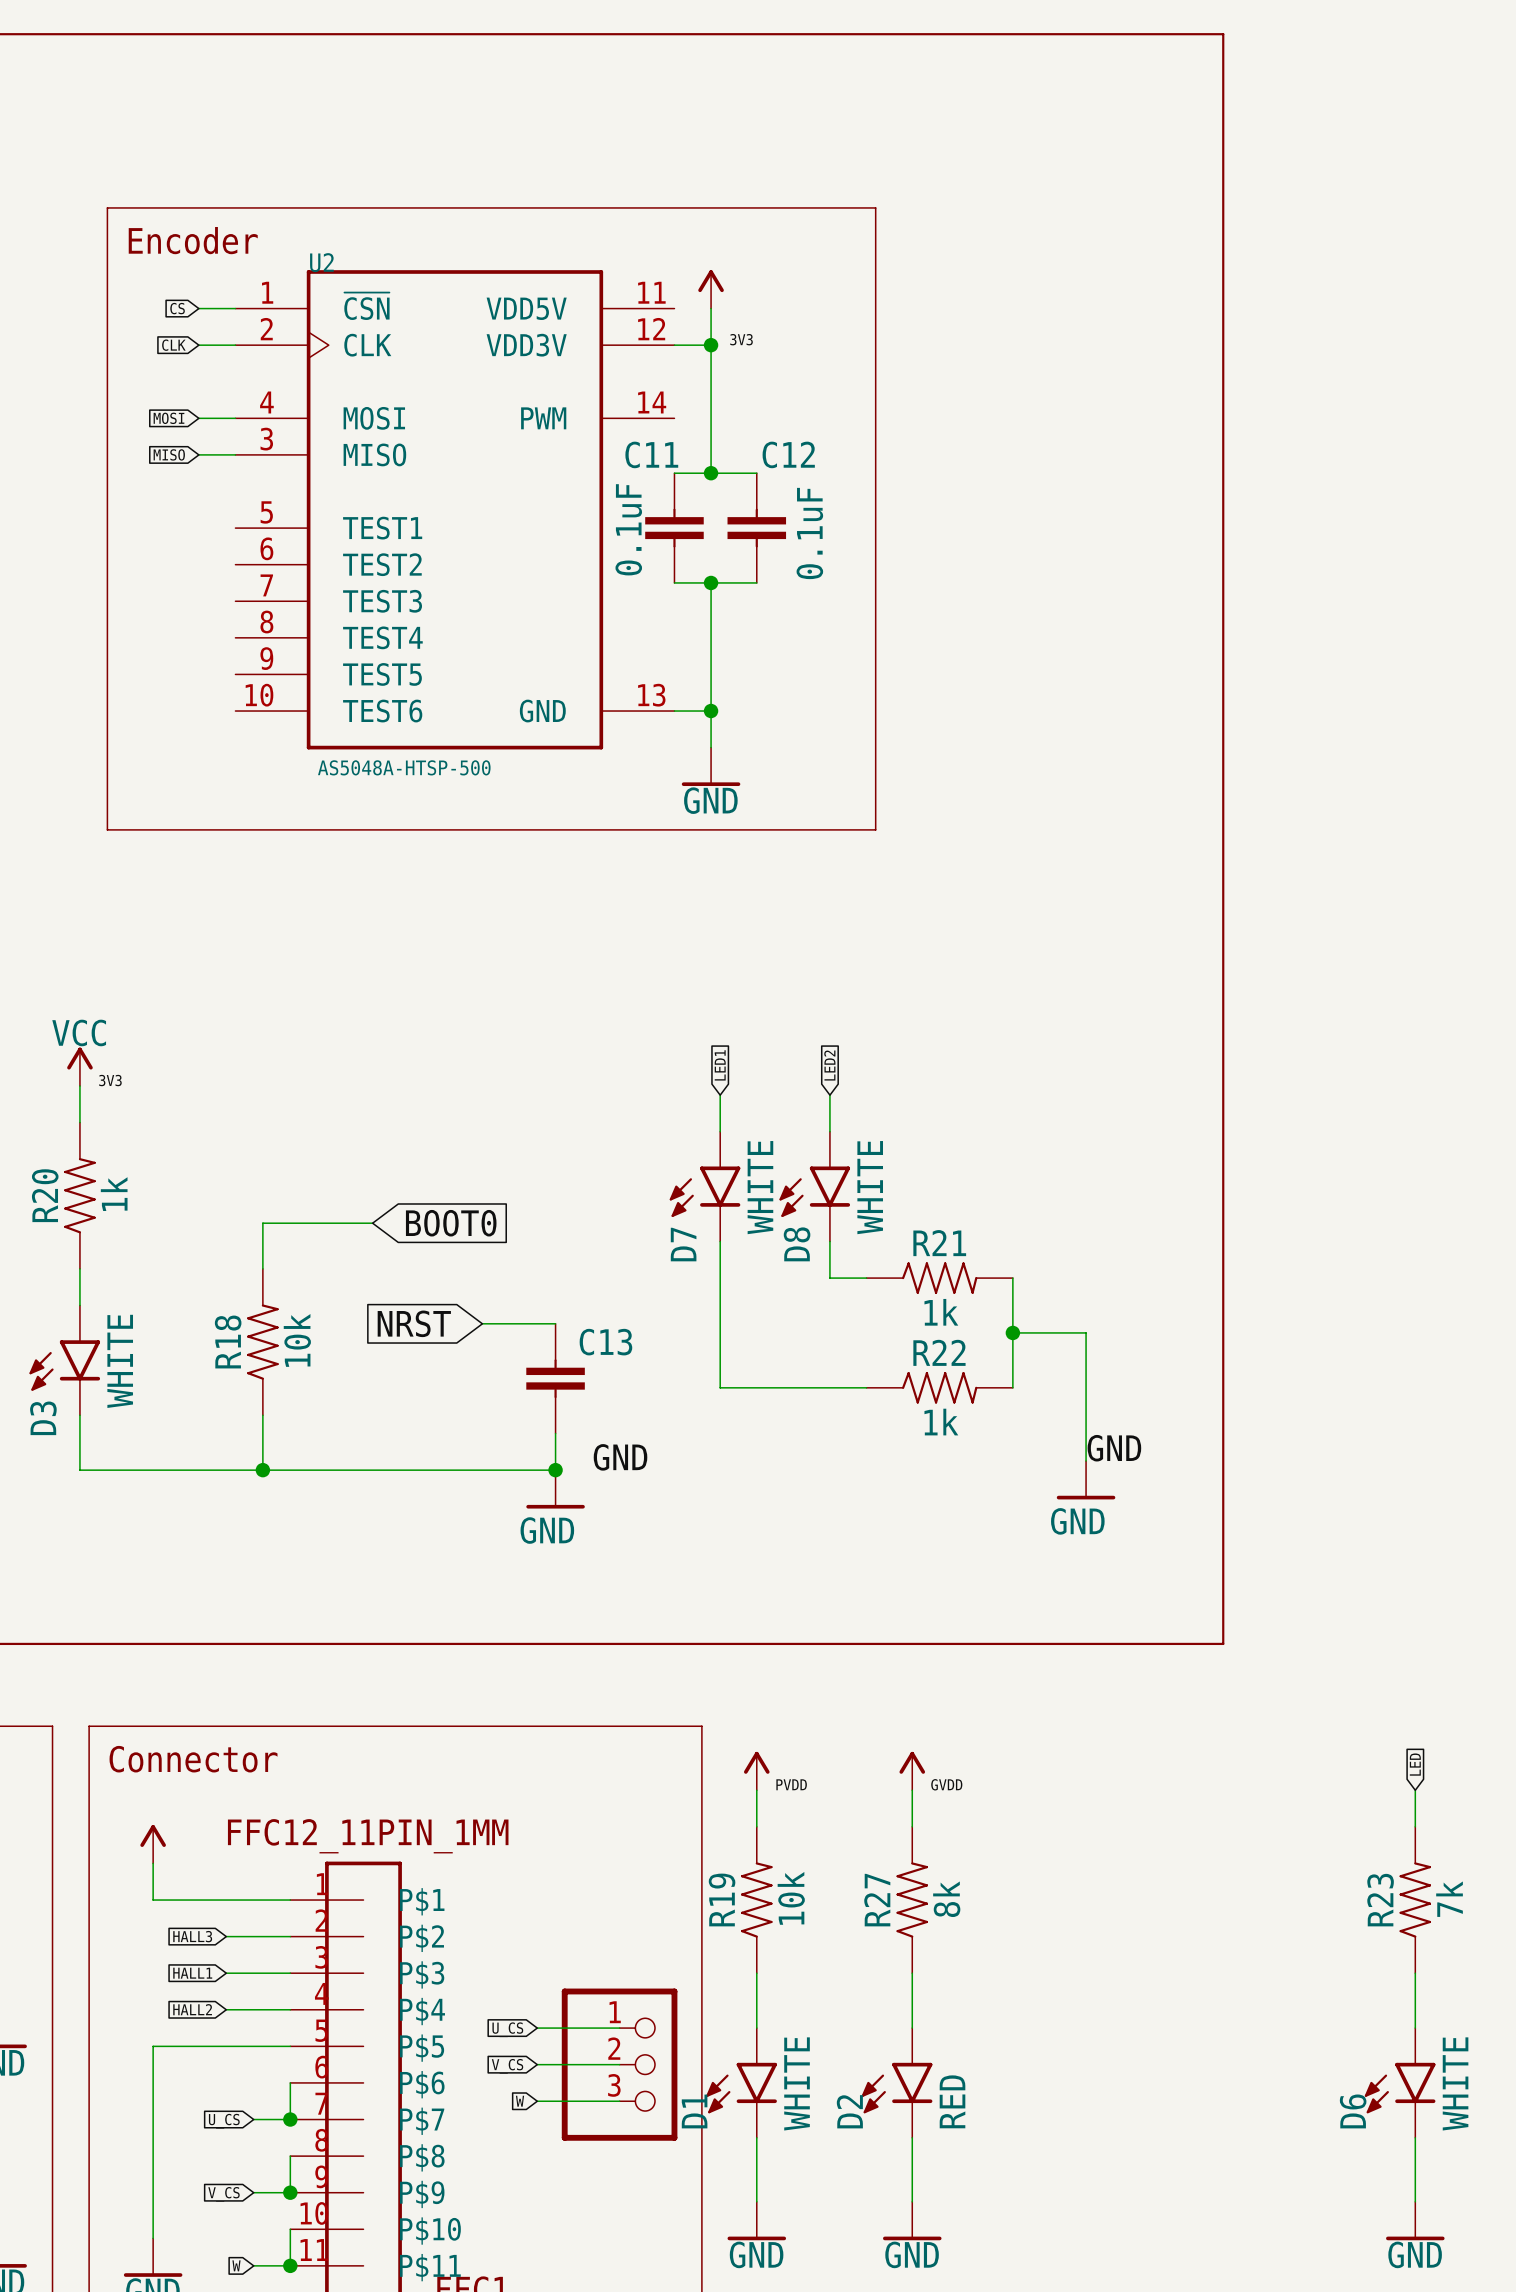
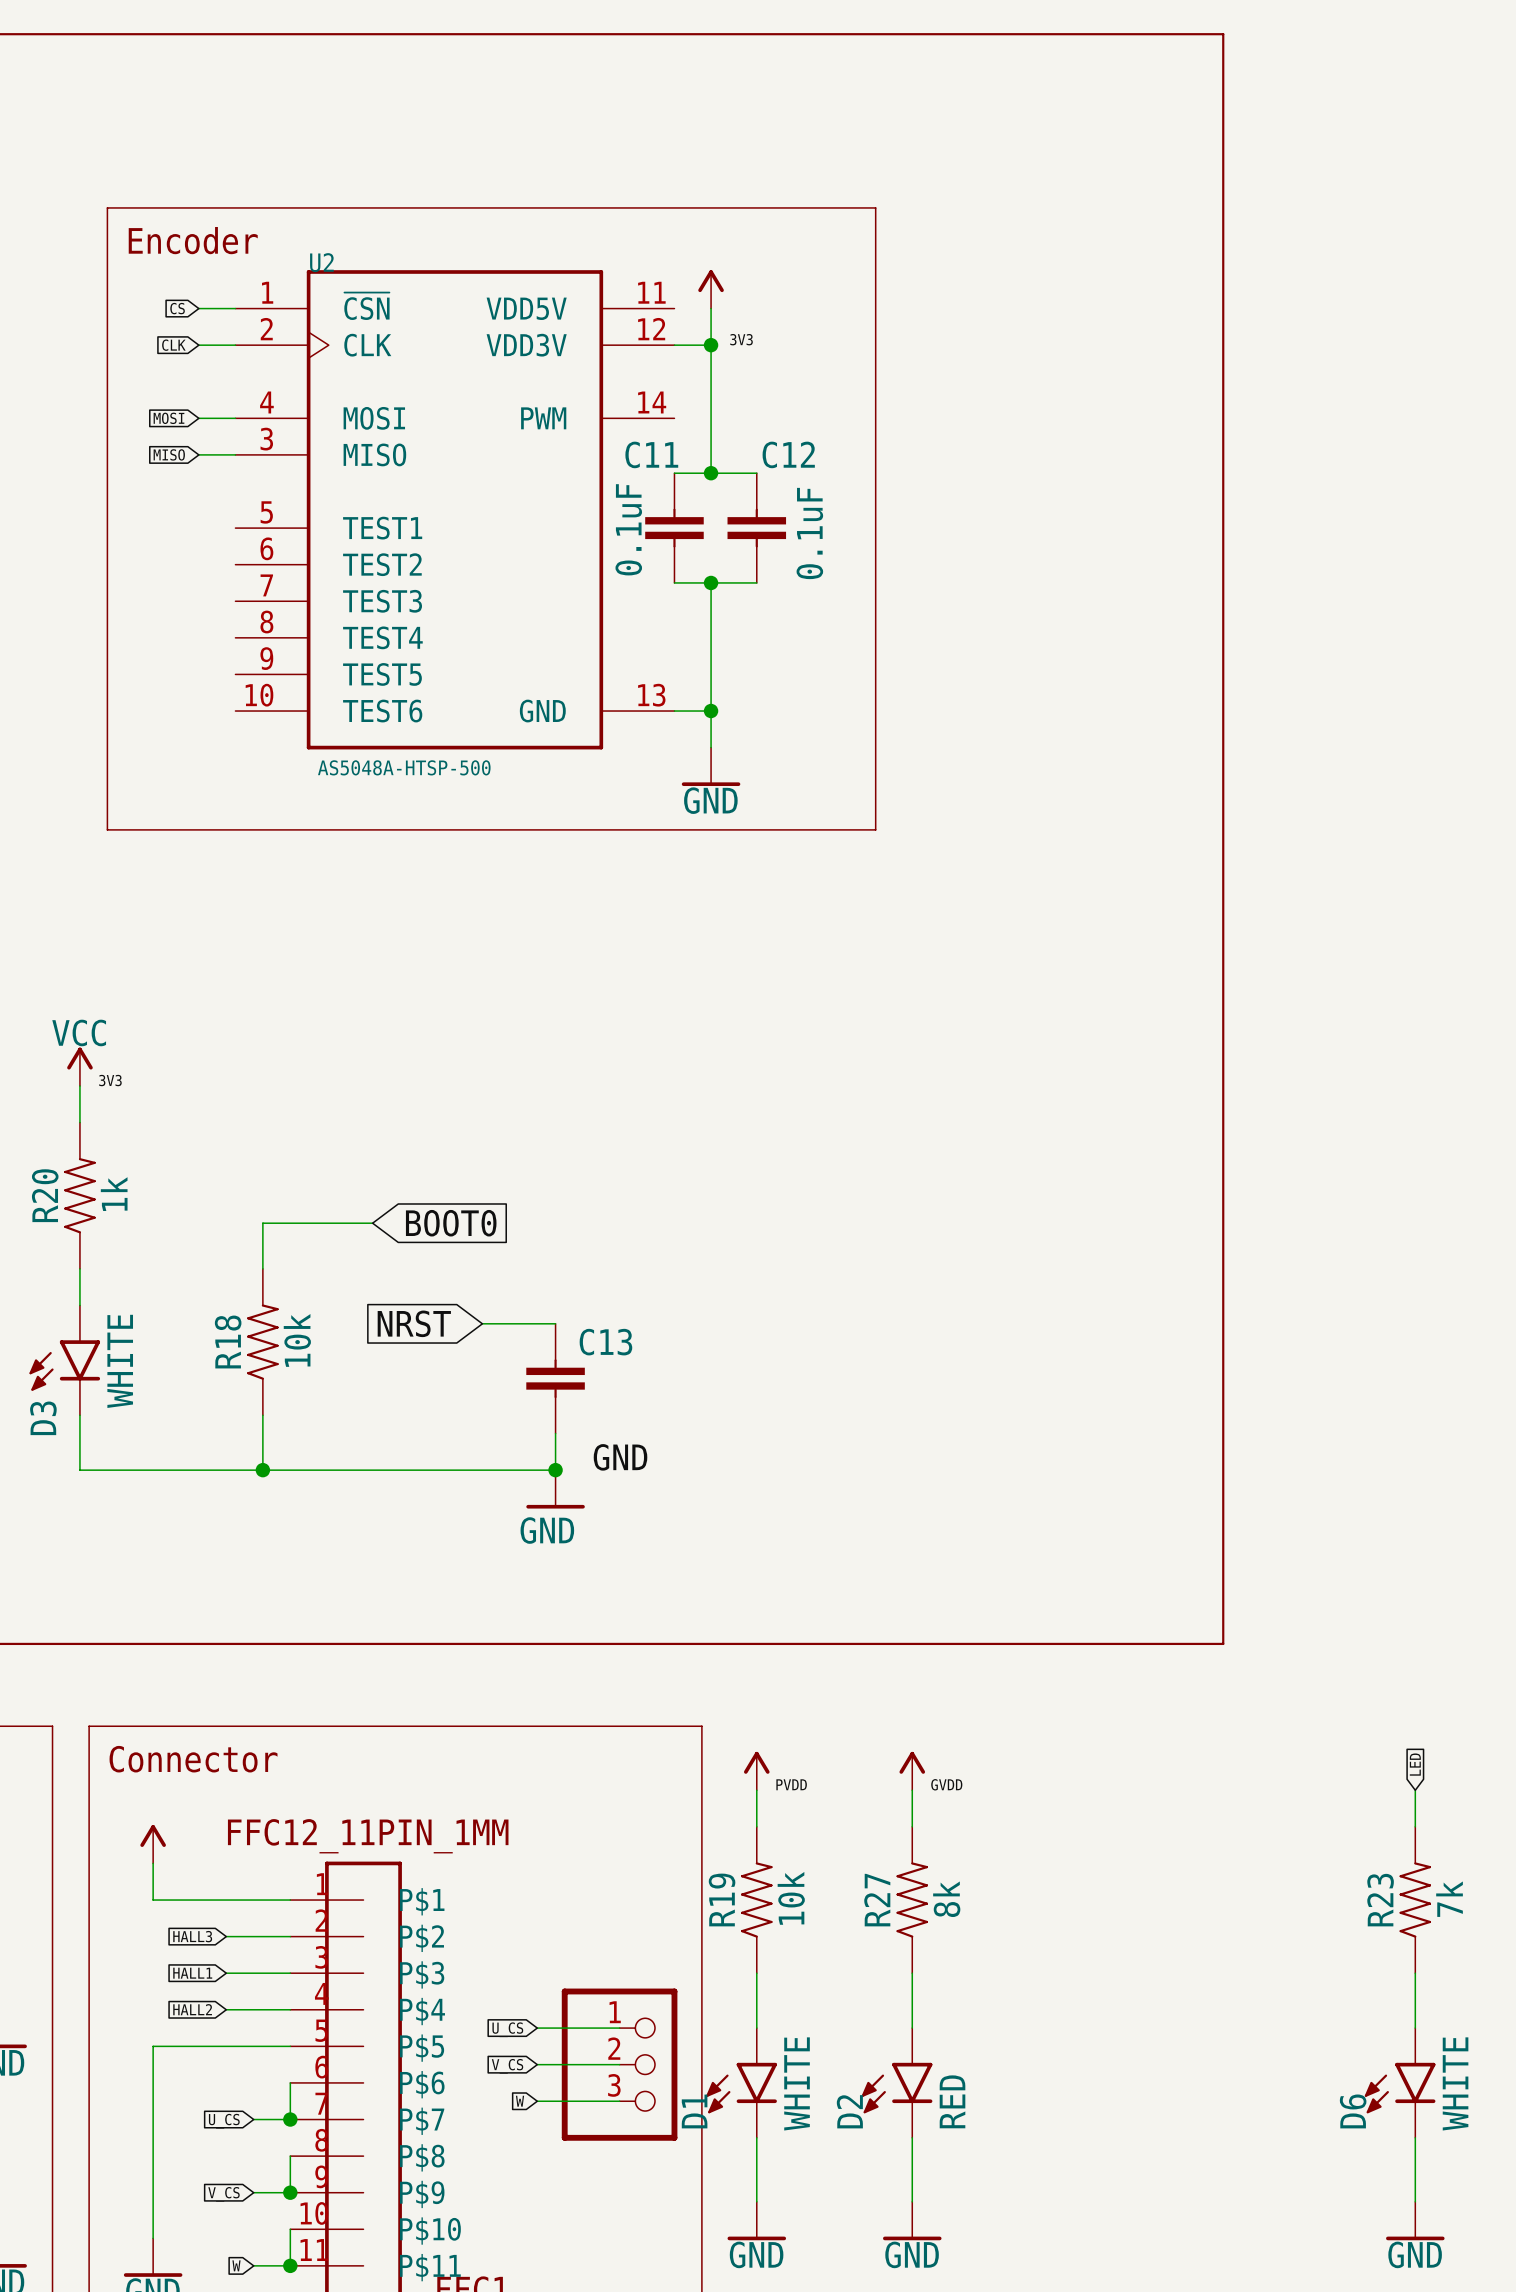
global label: LED1 (720, 1065) -> none
global label: LED2 (829, 1065) -> none
wire: (720, 1095) (720, 1131) -> none
wire: (829, 1095) (829, 1131) -> none
D7: WHITE (705, 1186) -> none
D8: WHITE (814, 1186) -> none
wire: (720, 1241) (720, 1387) (866, 1387) -> none
wire: (829, 1241) (829, 1278) (866, 1278) -> none
R21: 1k (939, 1278) -> none
wire: (1012, 1278) (1012, 1387) -> none
wire: (1012, 1332) (1086, 1332) (1086, 1461) -> none
junction: (1012, 1332) -> none
R22: 1k (939, 1387) -> none
label: GND (1114, 1448) -> none
power symbol: GND (1086, 1480) -> none

